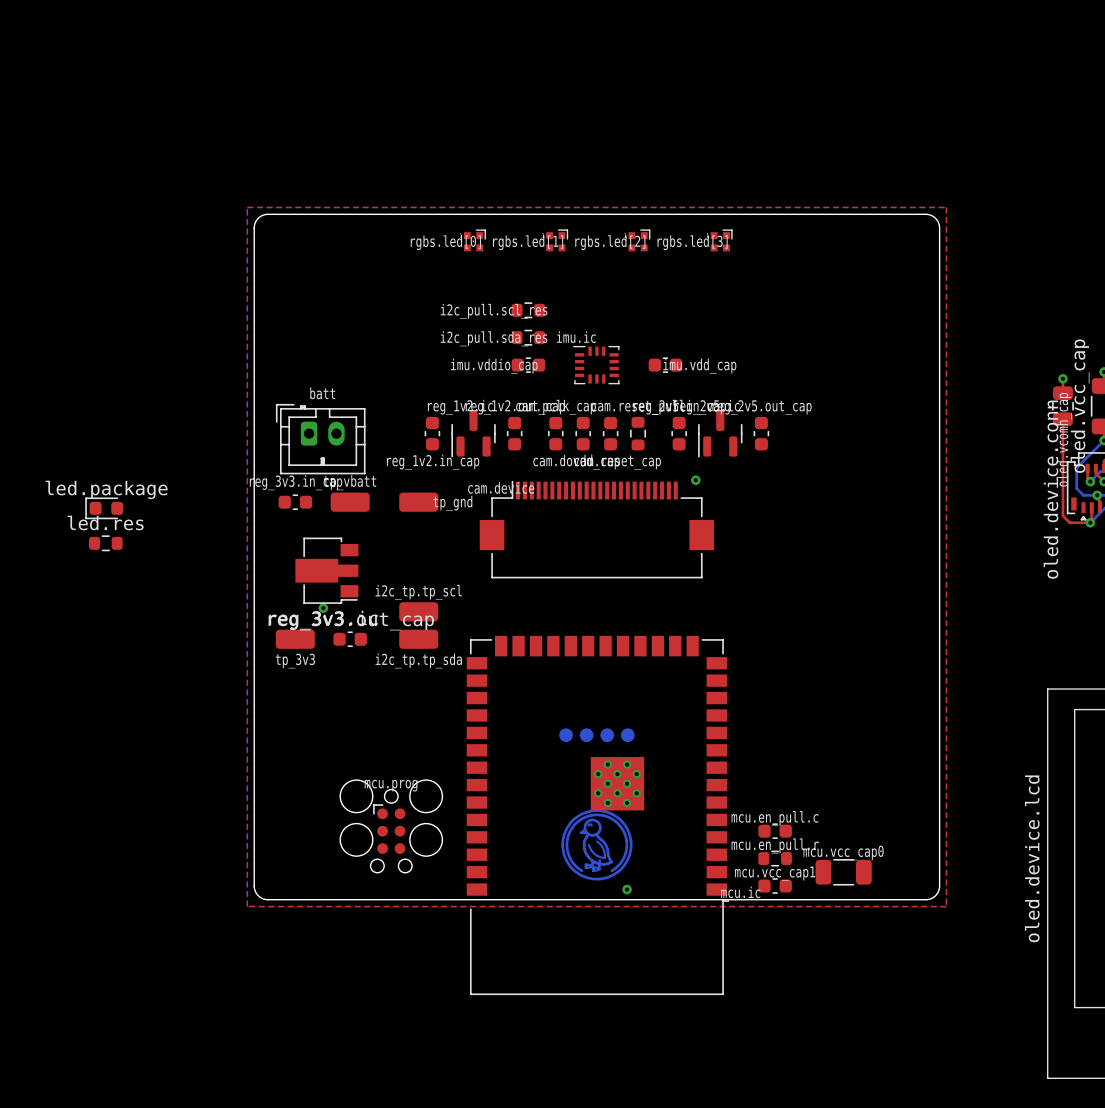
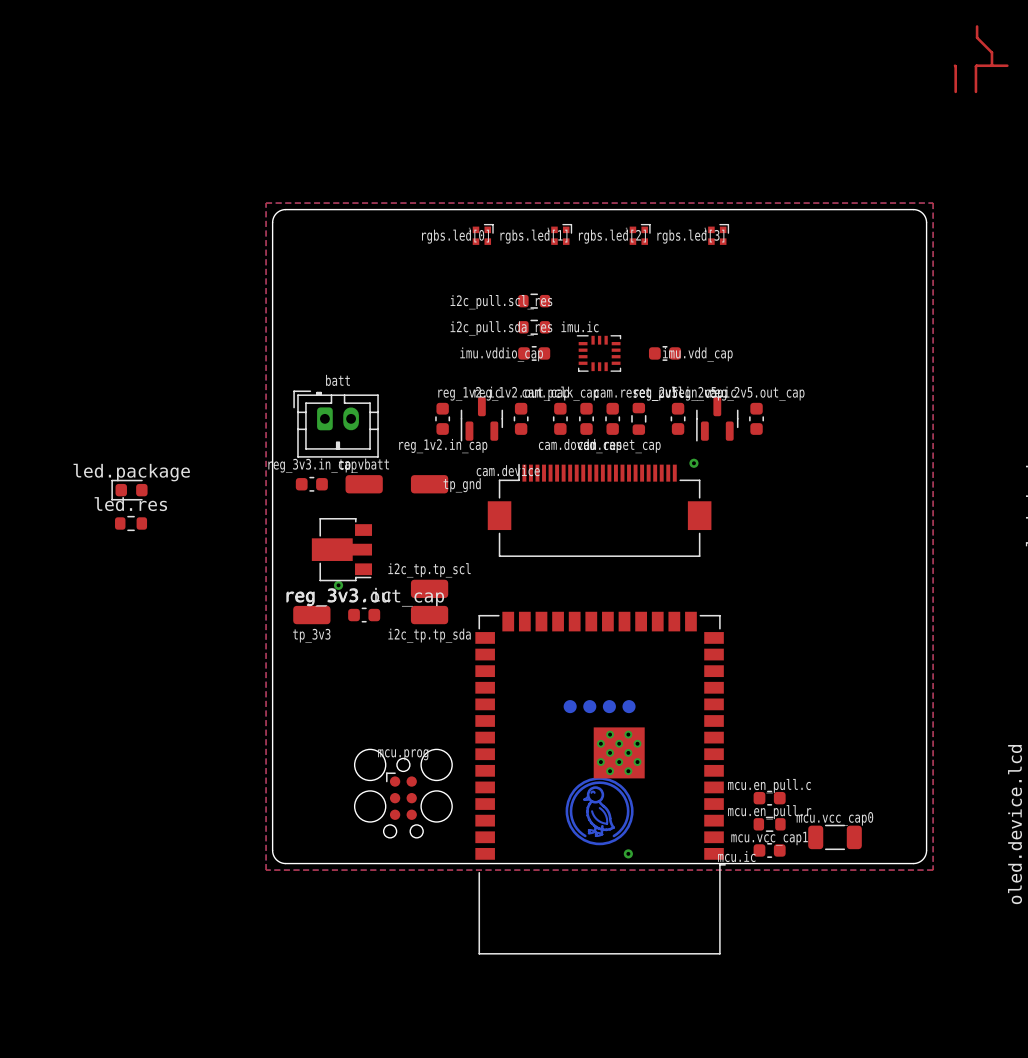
top track: none -> (977, 26) (977, 37) (991, 52) (991, 65)
top track: none -> (955, 65) (955, 91)
top track: none -> (1007, 65) (976, 65) (975, 91)

